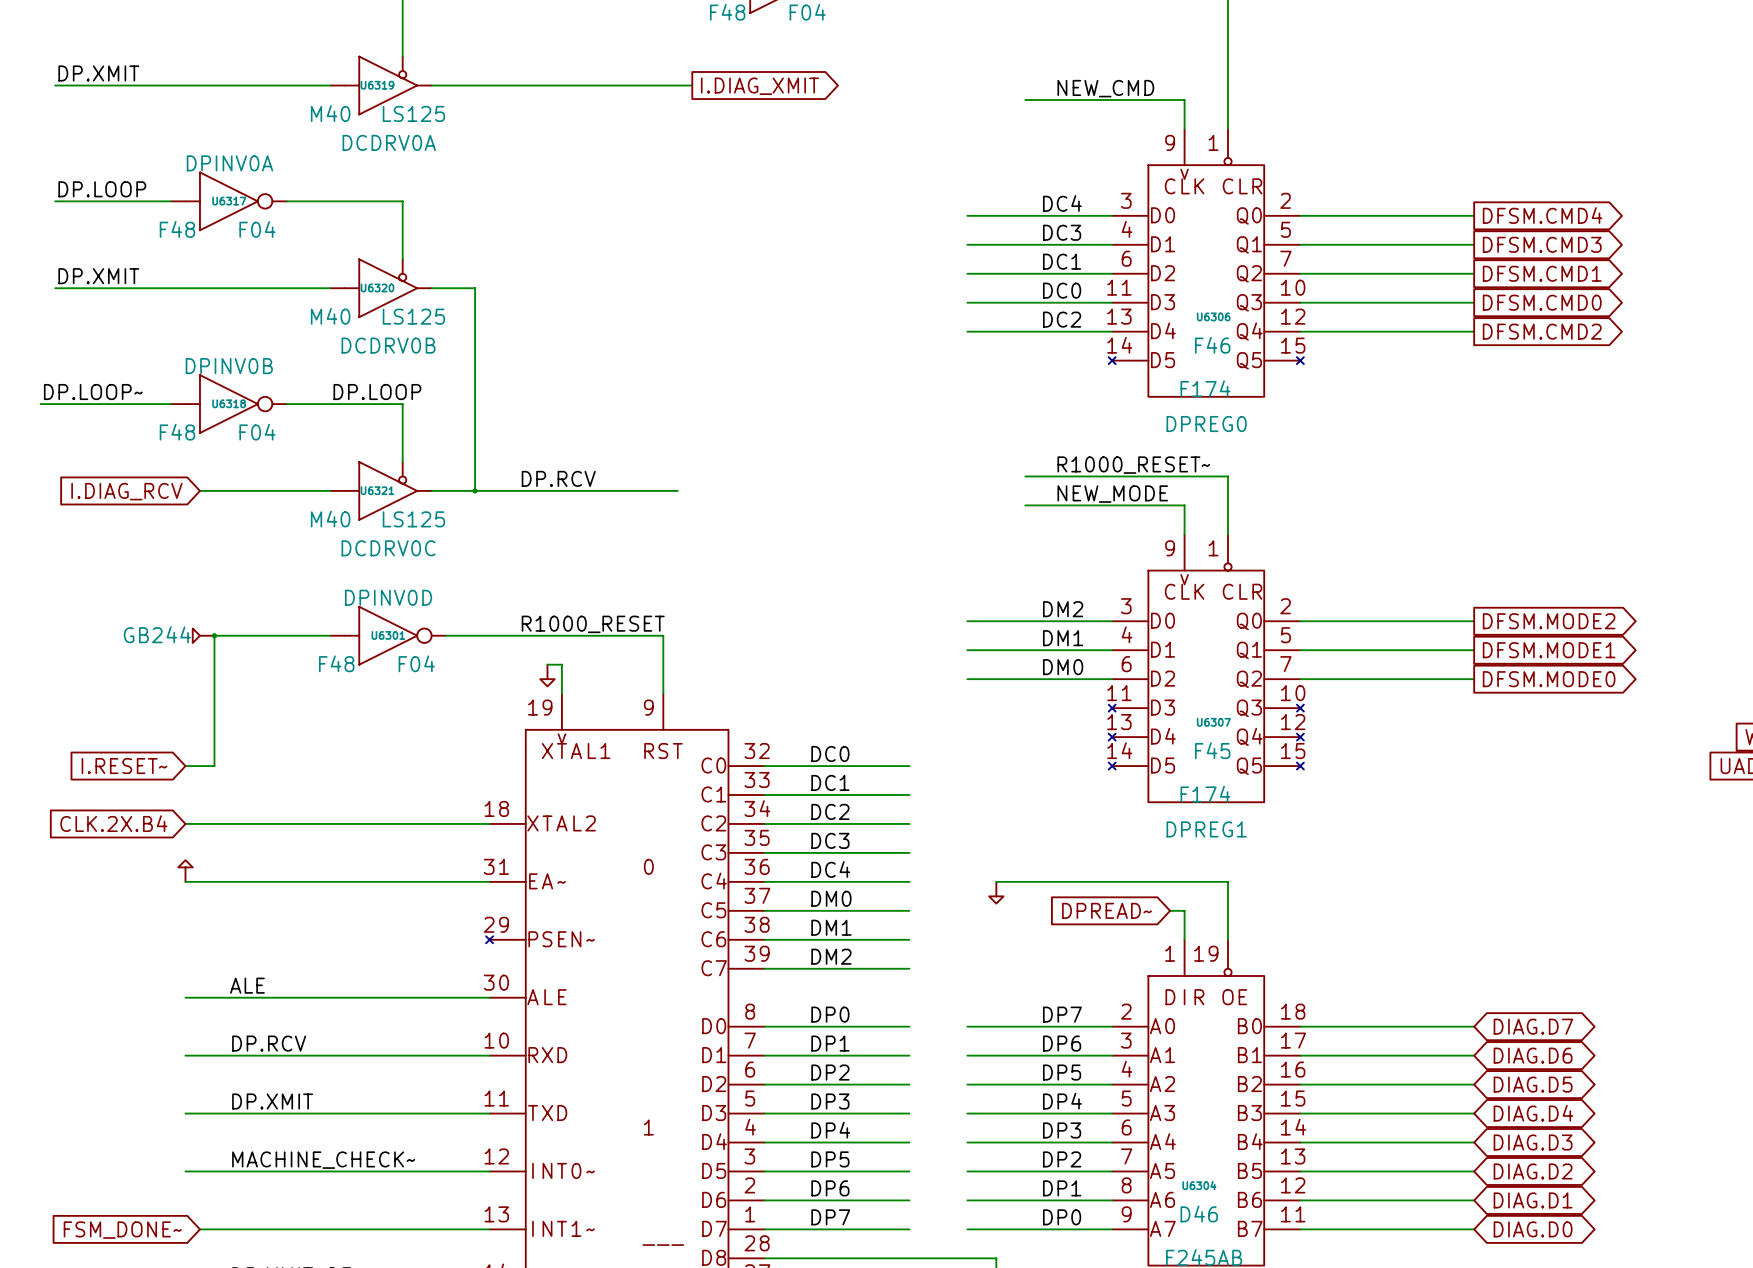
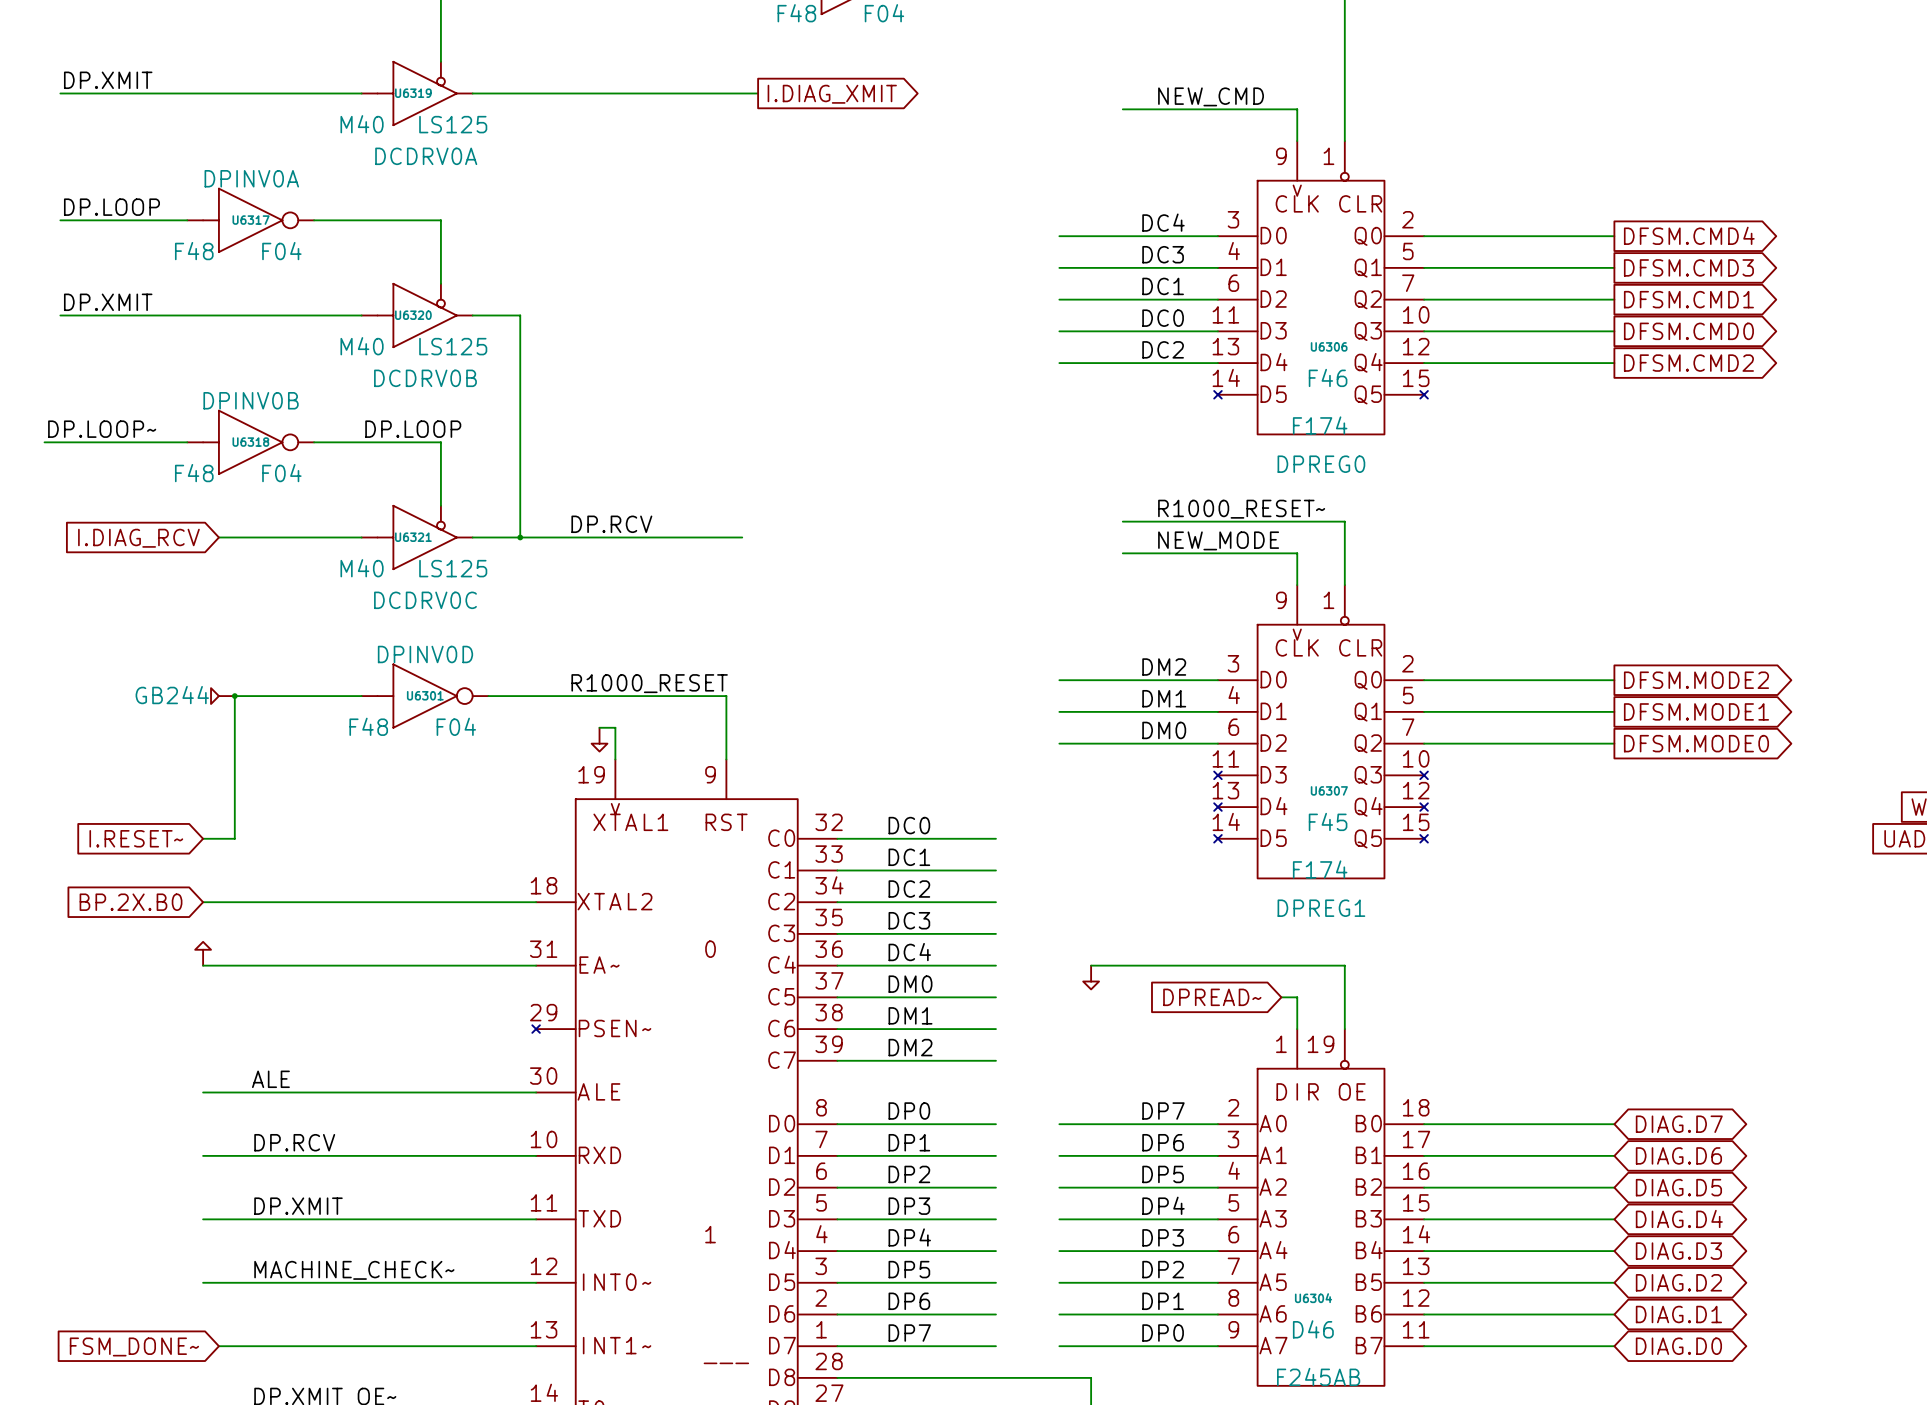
global label: CLK.2X.B4 (113, 823) -> BP.2X.B0 (131, 902)

